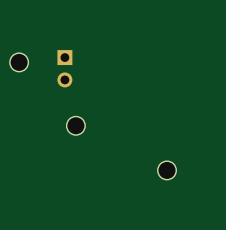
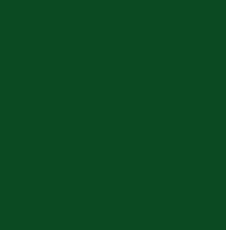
part: (19, 62) -> none
part: (64, 68) -> none
part: (75, 125) -> none
part: (167, 170) -> none

